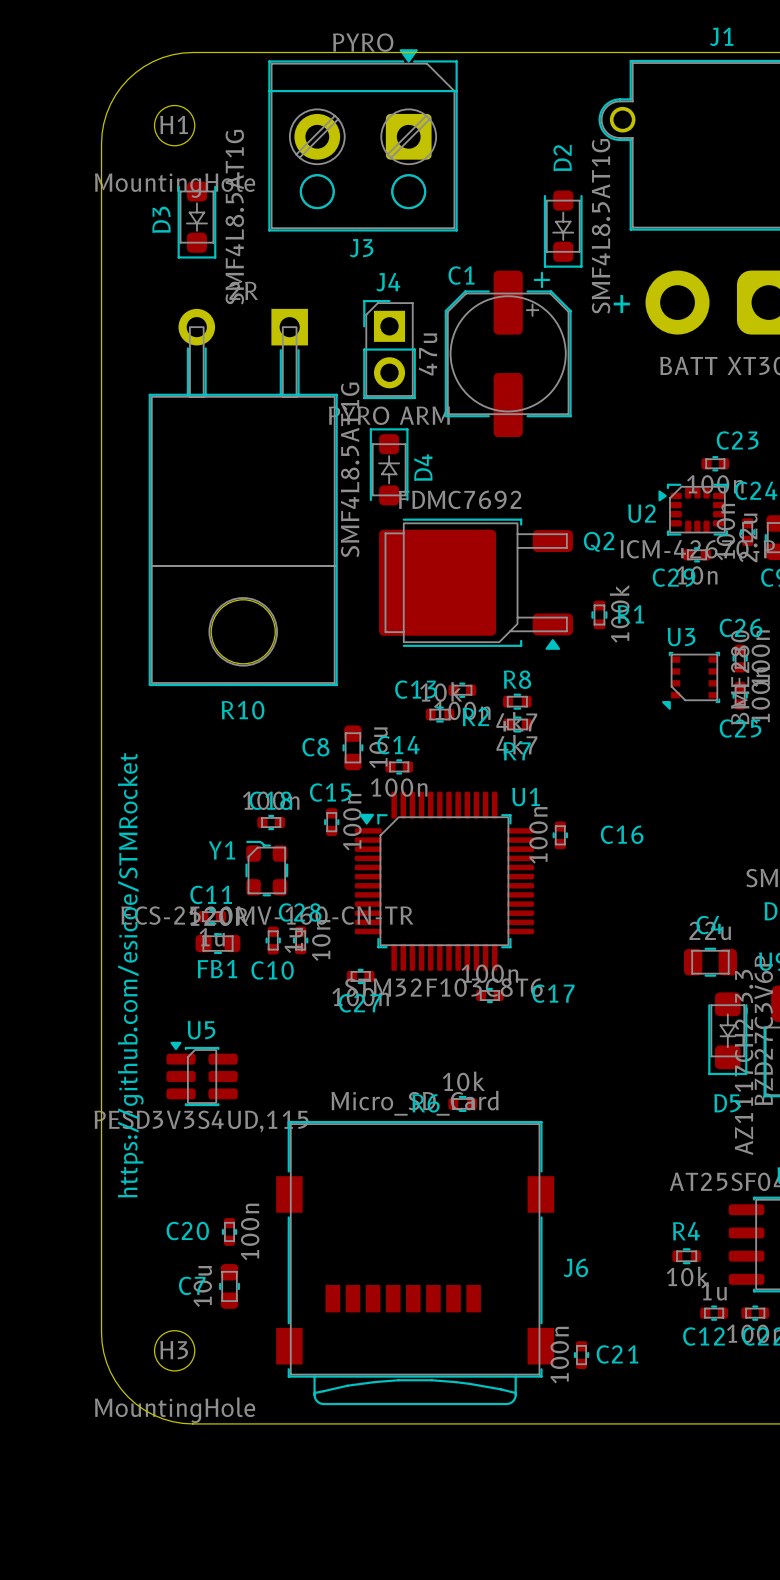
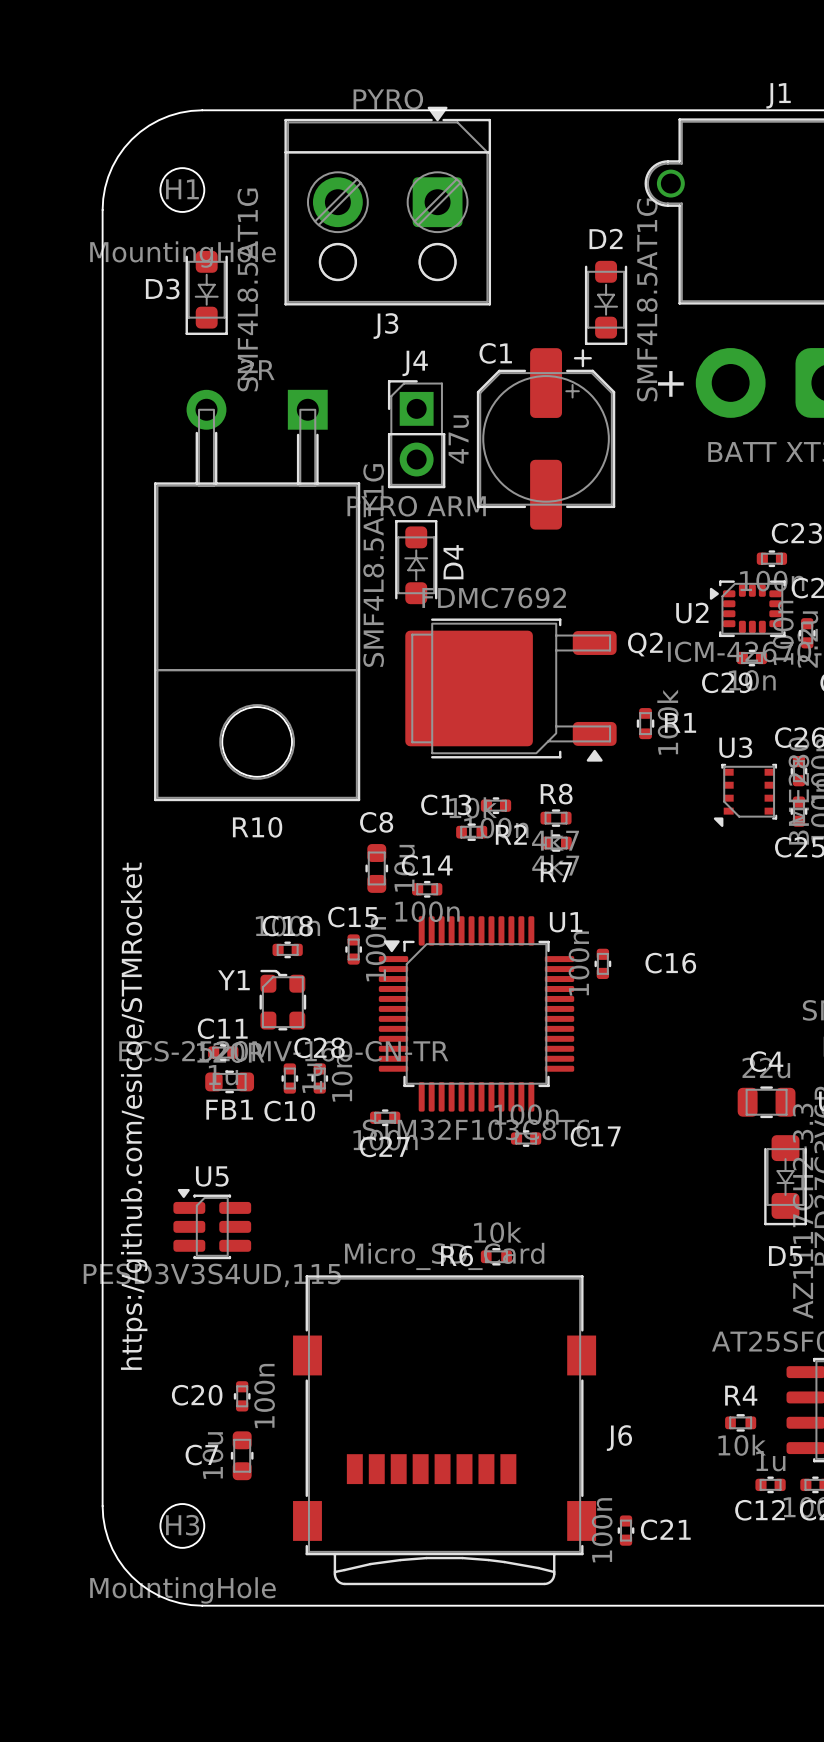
D2 name rotation: 0° (562, 158) -> 90° clockwise (606, 238)
D3 name rotation: 0° (161, 219) -> 90° clockwise (162, 289)
C8 name position: C8 (315, 747) -> C8 (376, 822)

